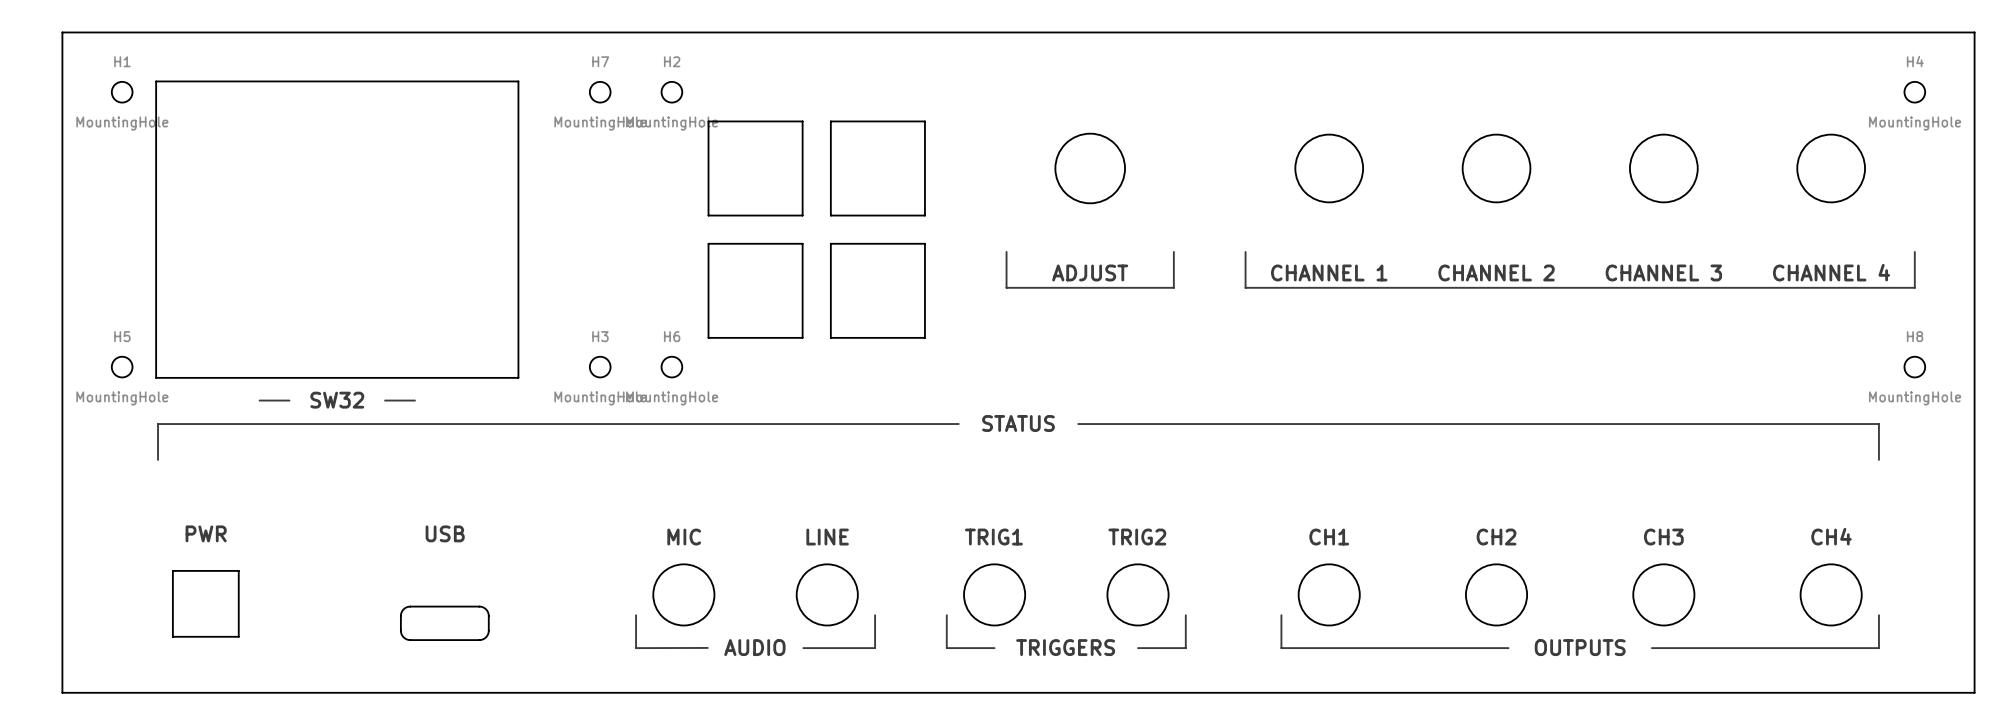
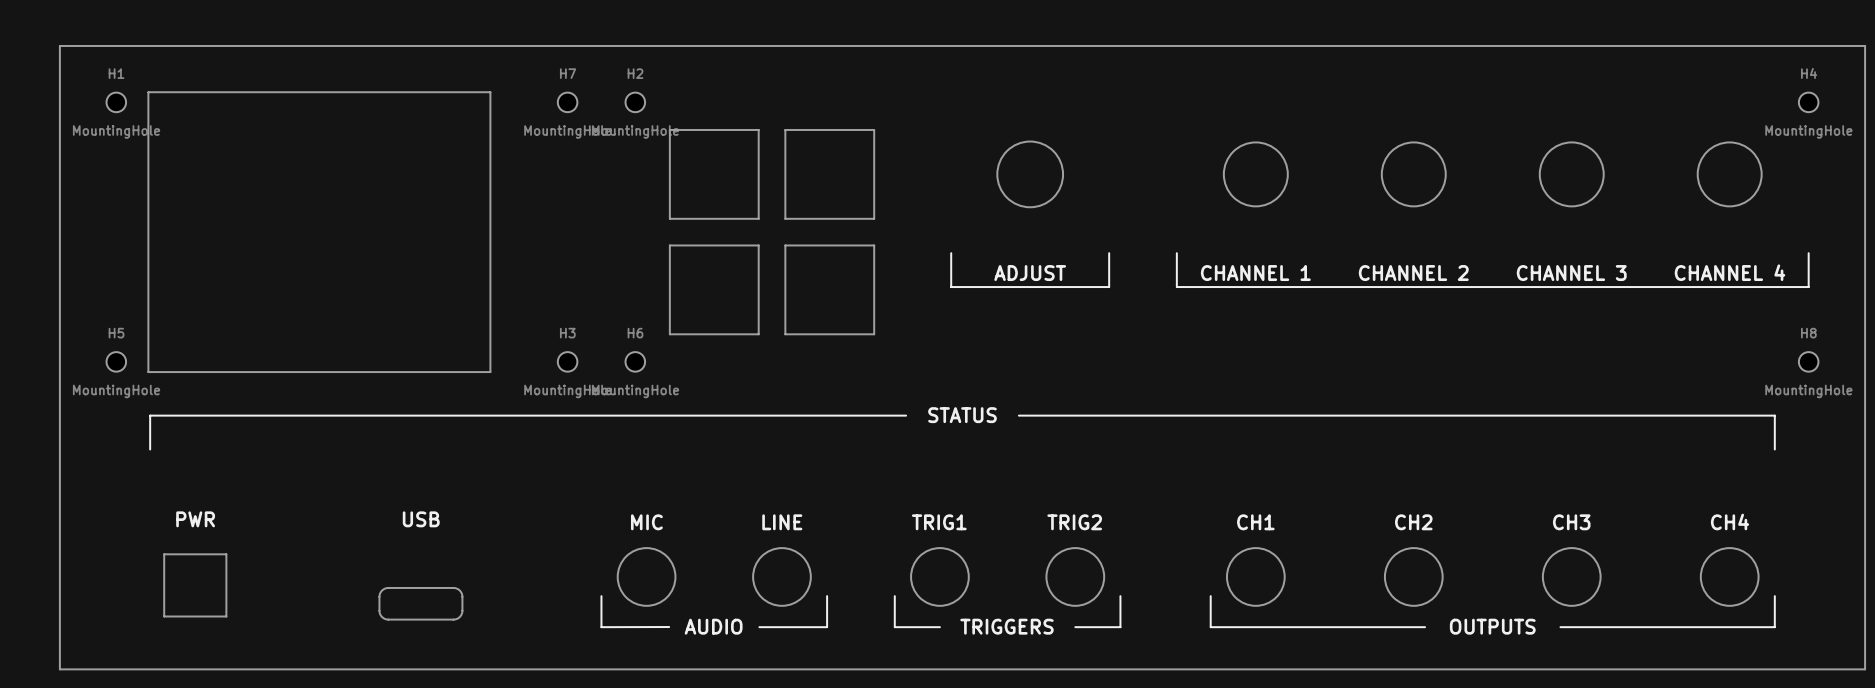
line: (259, 400) (289, 400) -> none
text: SW32 (337, 400) -> none
line: (385, 400) (414, 400) -> none

